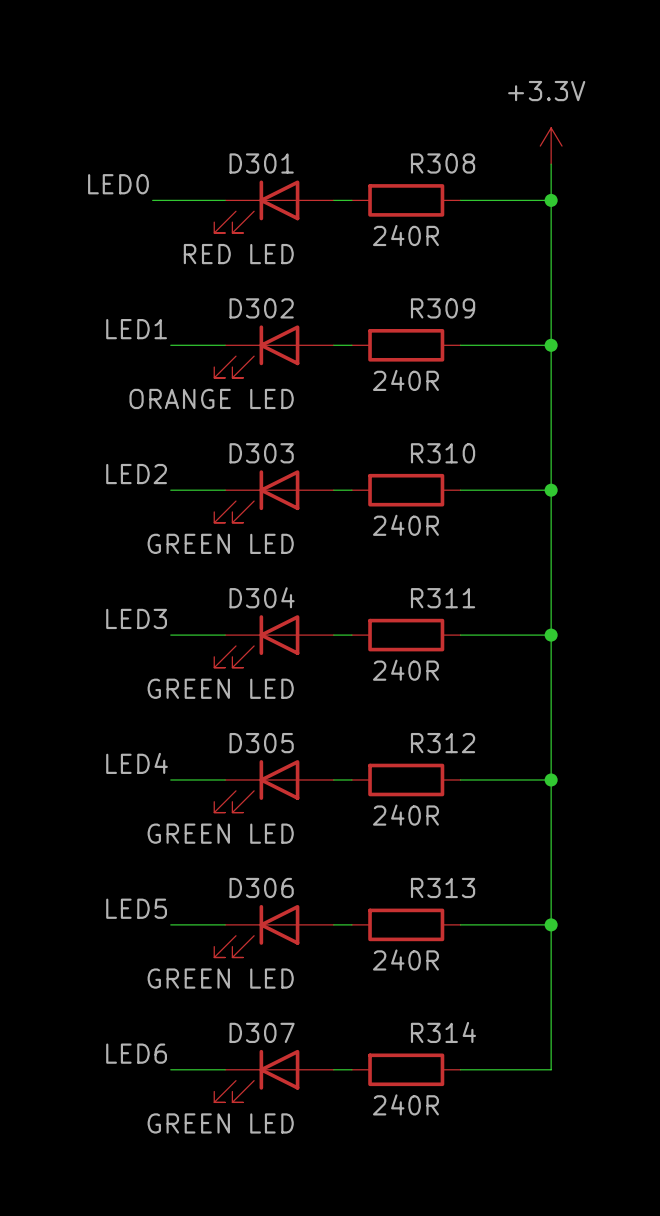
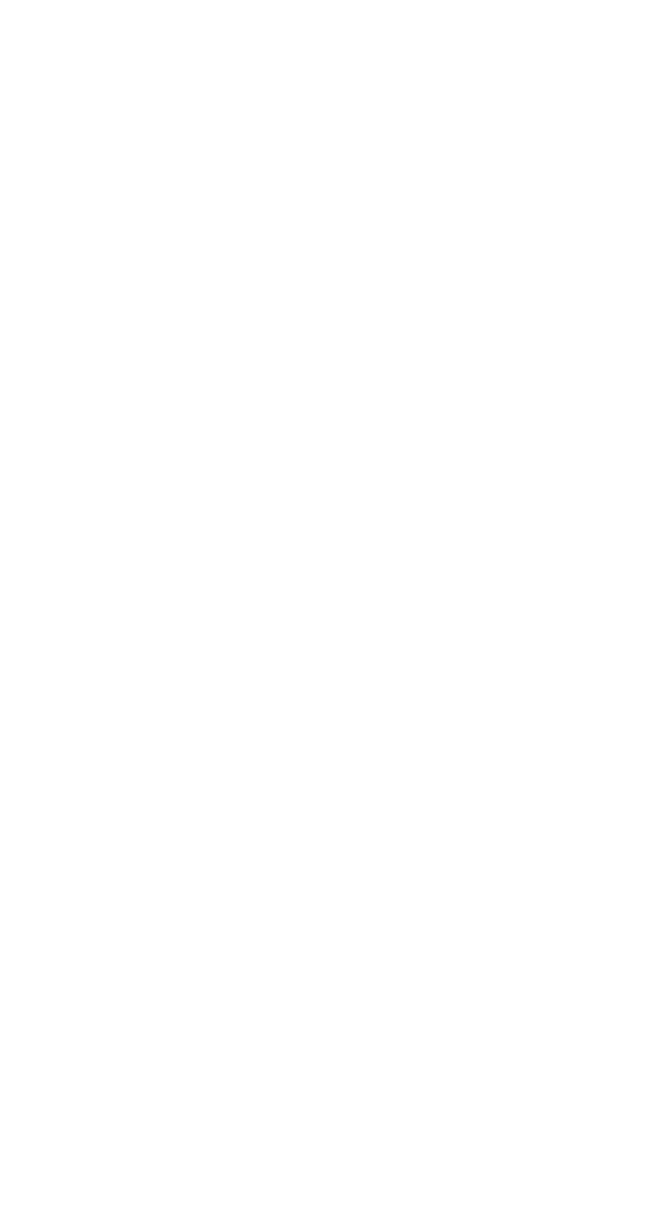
power symbol: +3.3V (551, 146) -> none
wire: (551, 164) (551, 1069) (460, 1069) -> none
label: LED0 (118, 184) -> none
wire: (152, 200) (225, 200) -> none
wire: (333, 200) (351, 200) -> none
R308: 240R (406, 200) -> none
wire: (460, 200) (551, 200) -> none
junction: (551, 200) -> none
D301: RED LED (274, 206) -> none
label: LED1 (136, 329) -> none
wire: (170, 345) (225, 345) -> none
wire: (333, 345) (351, 345) -> none
R309: 240R (406, 345) -> none
wire: (460, 345) (551, 345) -> none
junction: (551, 345) -> none
D302: ORANGE LED (274, 351) -> none
label: LED2 (136, 474) -> none
wire: (170, 490) (225, 490) -> none
wire: (333, 490) (351, 490) -> none
R310: 240R (406, 490) -> none
wire: (460, 490) (551, 490) -> none
junction: (551, 490) -> none
D303: GREEN LED (274, 496) -> none
label: LED3 (136, 618) -> none
wire: (170, 635) (225, 635) -> none
wire: (333, 635) (351, 635) -> none
R311: 240R (406, 635) -> none
wire: (460, 635) (551, 635) -> none
junction: (551, 635) -> none
D304: GREEN LED (274, 641) -> none
label: LED4 (137, 763) -> none
wire: (170, 779) (225, 779) -> none
wire: (333, 779) (351, 779) -> none
R312: 240R (406, 779) -> none
wire: (460, 779) (551, 779) -> none
junction: (551, 779) -> none
D305: GREEN LED (274, 786) -> none
label: LED5 (136, 908) -> none
wire: (170, 924) (225, 924) -> none
wire: (333, 924) (351, 924) -> none
R313: 240R (406, 924) -> none
wire: (460, 924) (551, 924) -> none
junction: (551, 924) -> none
D306: GREEN LED (274, 931) -> none
label: LED6 (136, 1053) -> none
wire: (170, 1069) (225, 1069) -> none
wire: (333, 1069) (351, 1069) -> none
R314: 240R (406, 1069) -> none
D307: GREEN LED (274, 1076) -> none

